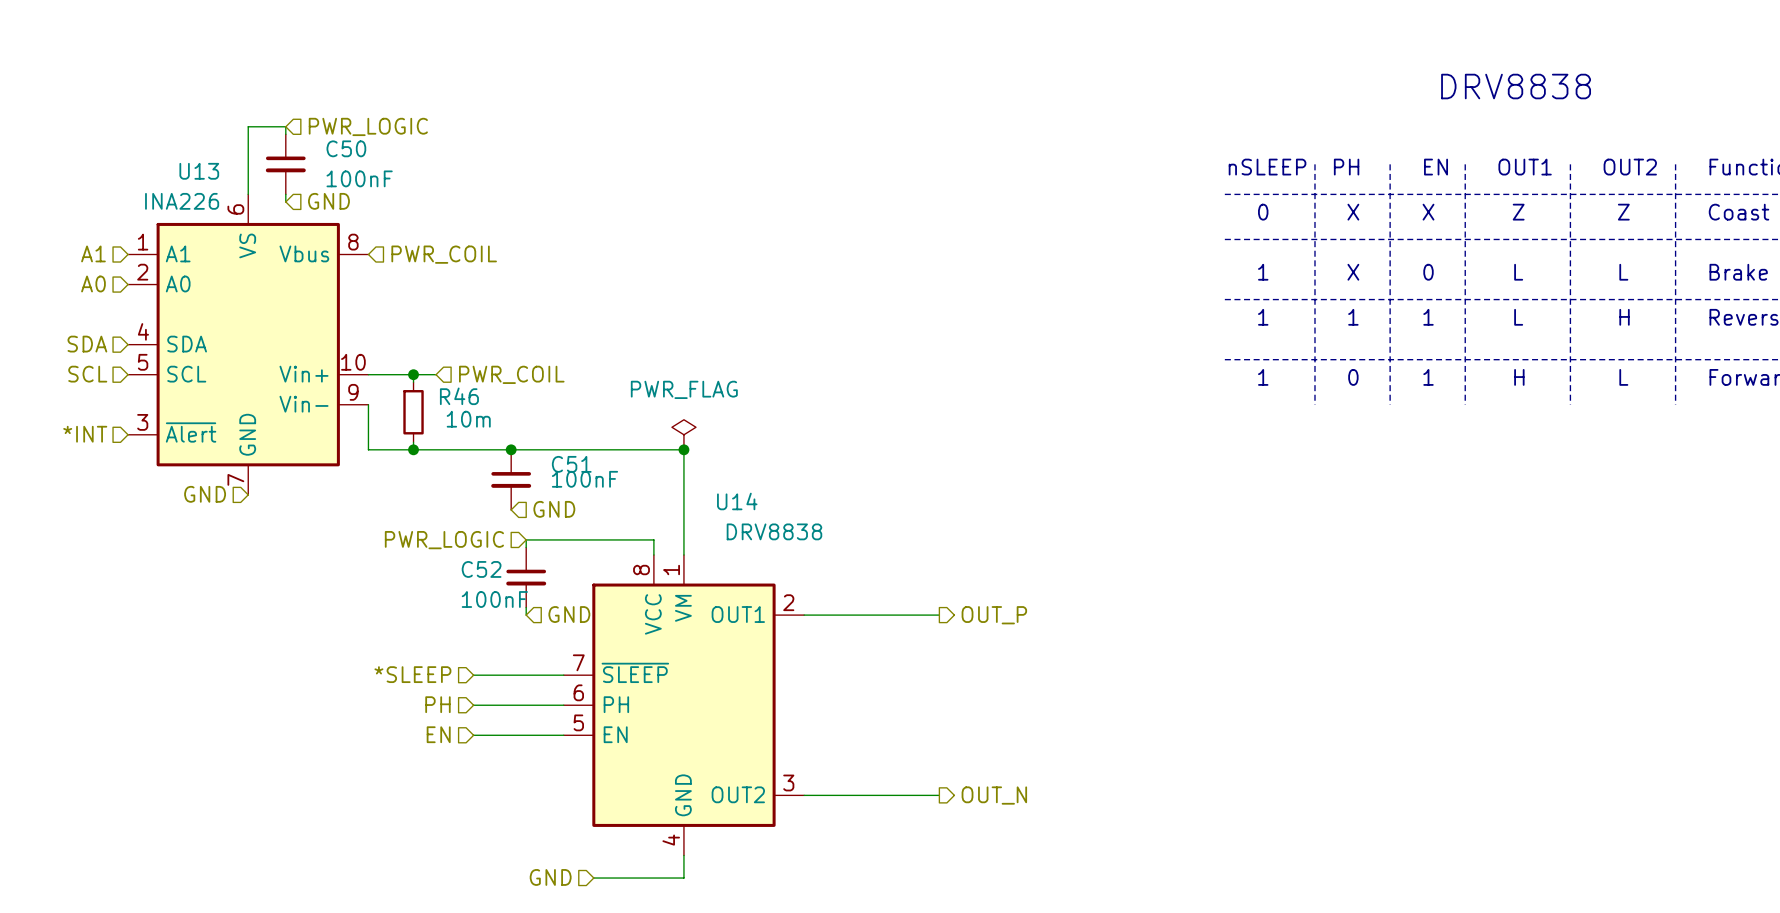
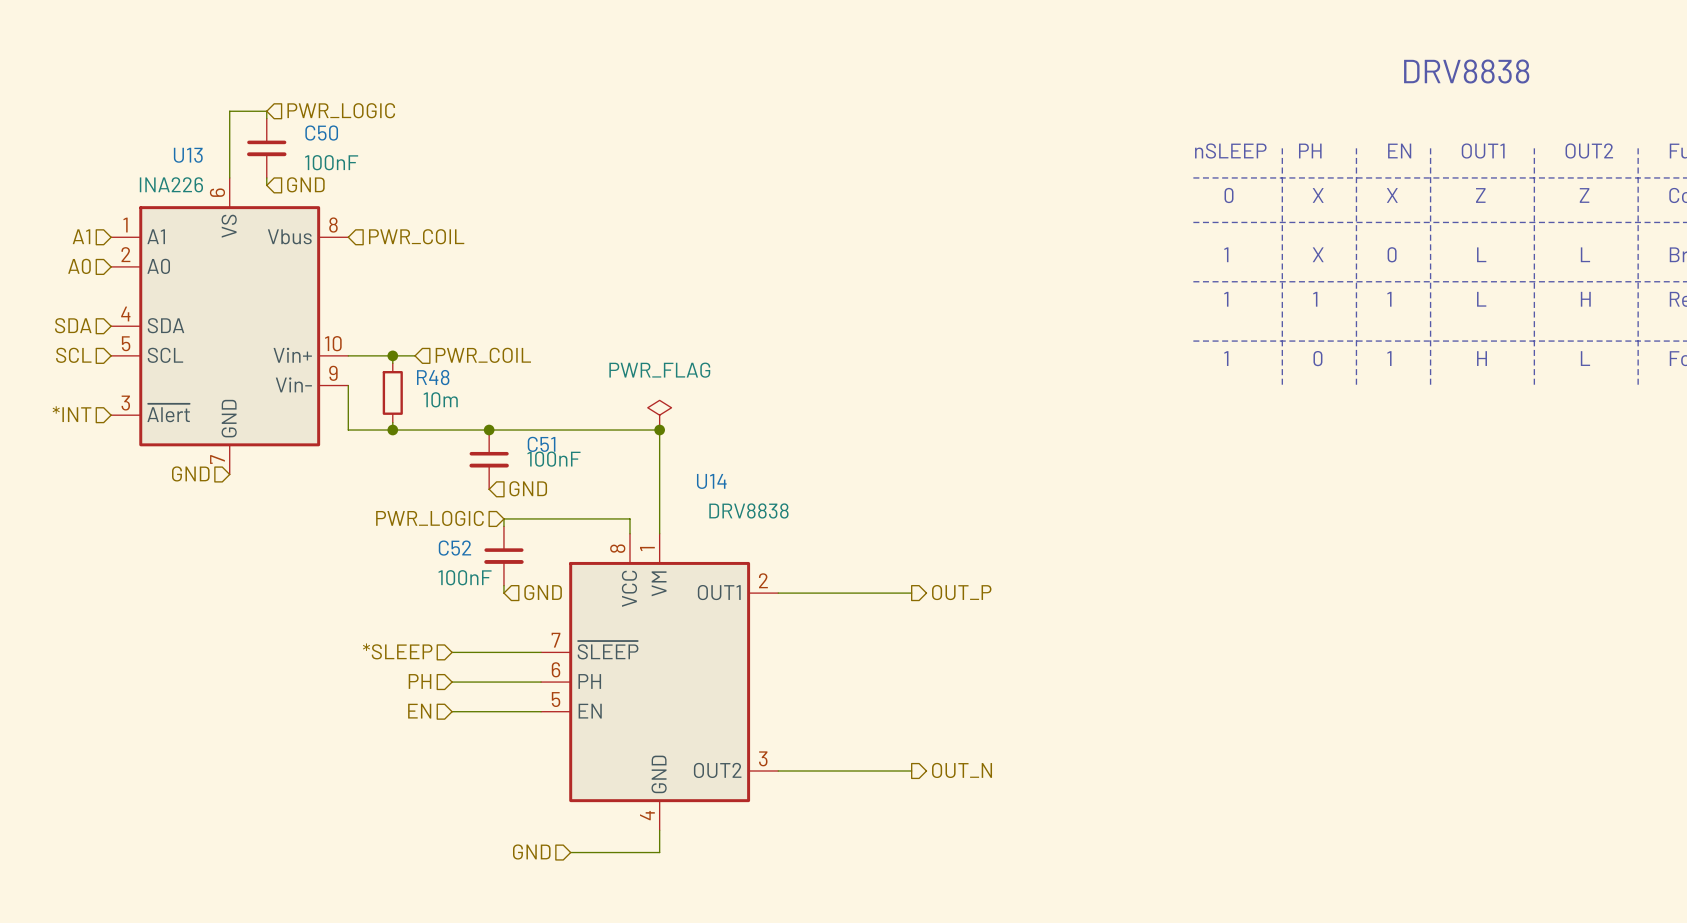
R46 name: R46 (459, 396) -> R48 (433, 377)

